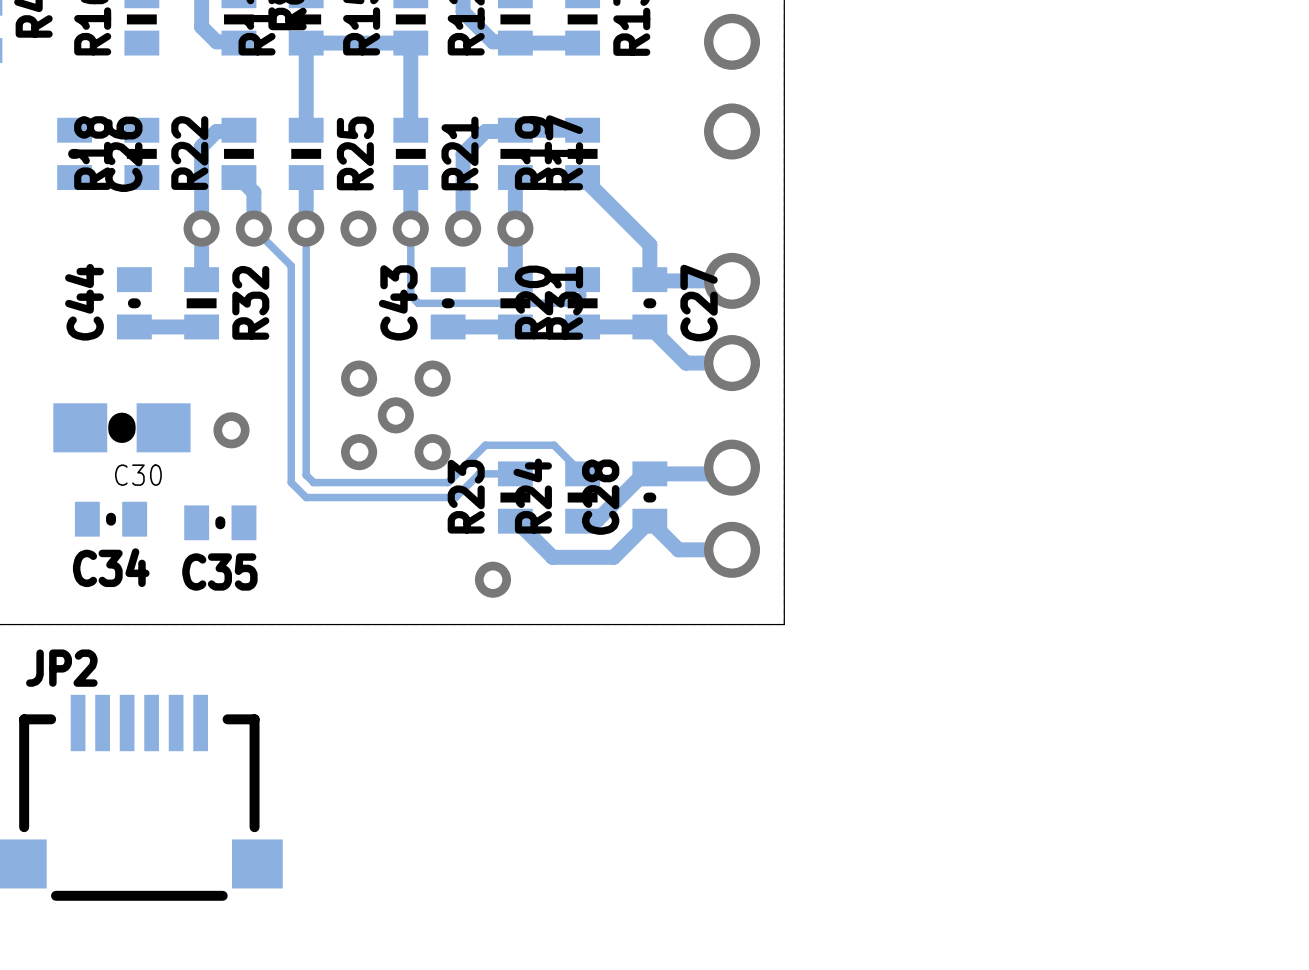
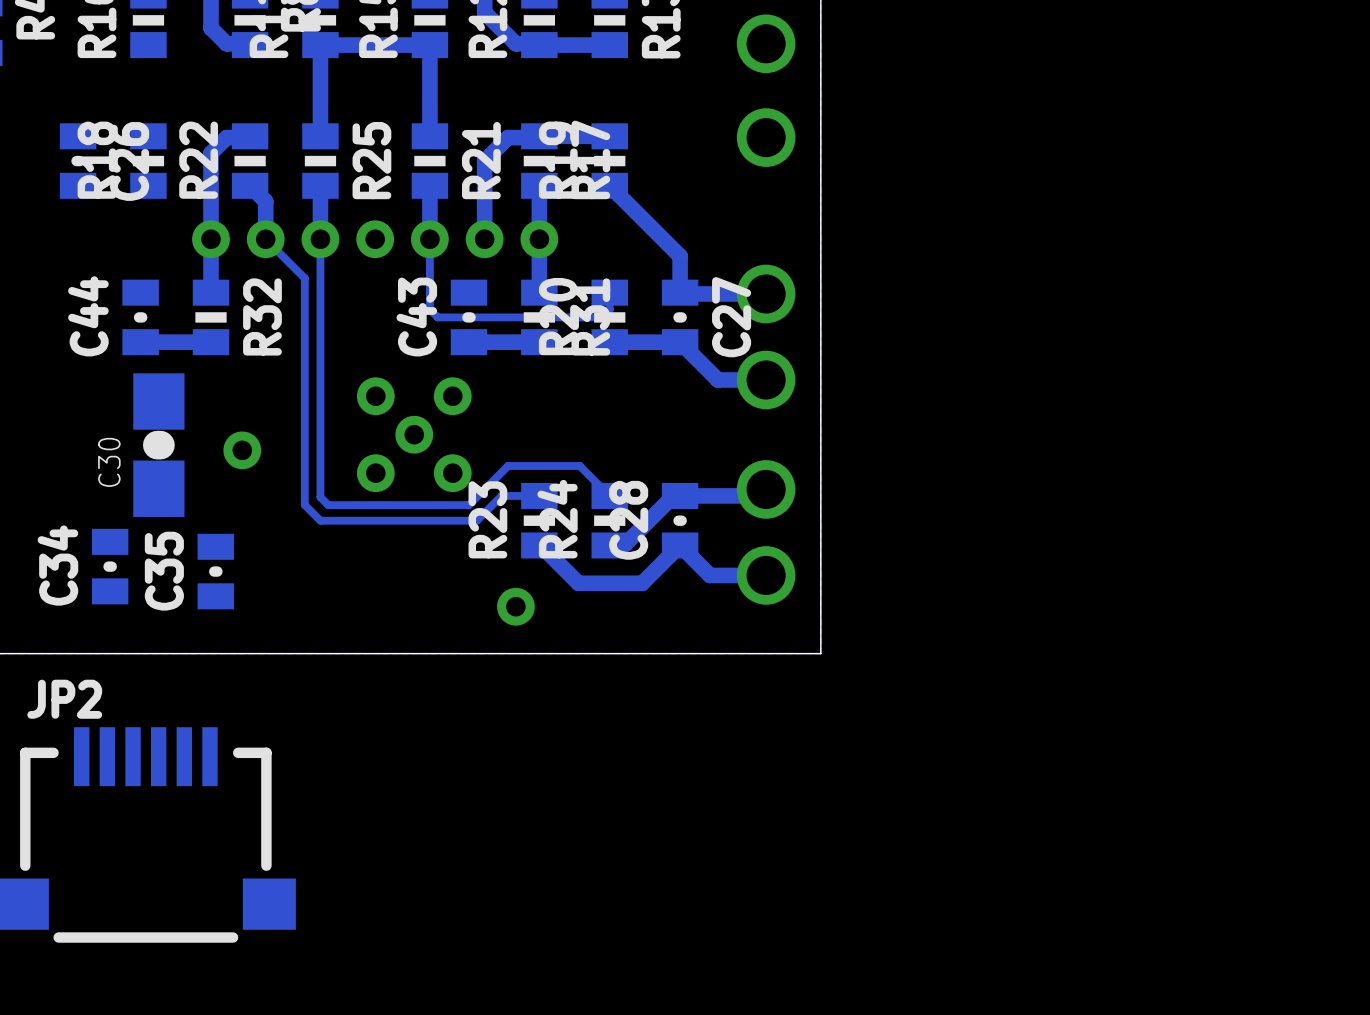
C30 rotation: 0° (121, 427) -> 90° clockwise (158, 445)
C34 rotation: 0° (111, 519) -> 90° clockwise (110, 566)
C35 rotation: 0° (220, 522) -> 90° clockwise (215, 571)

